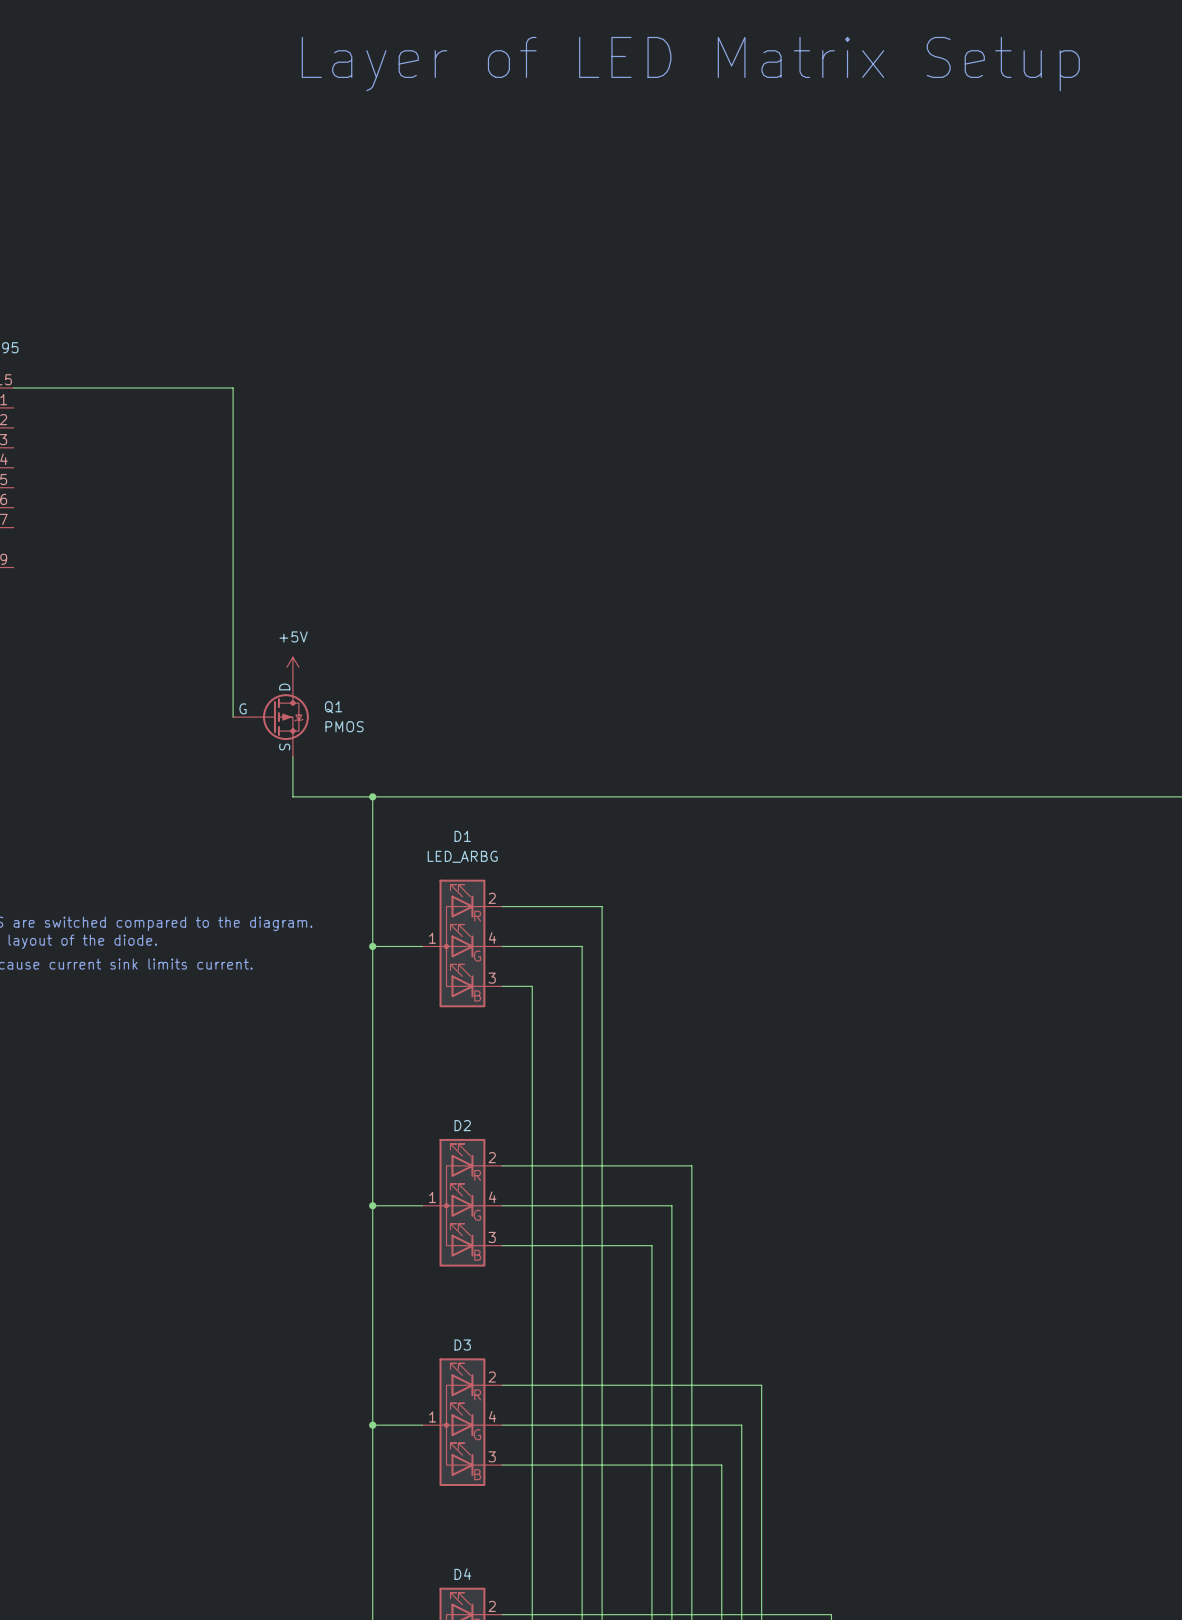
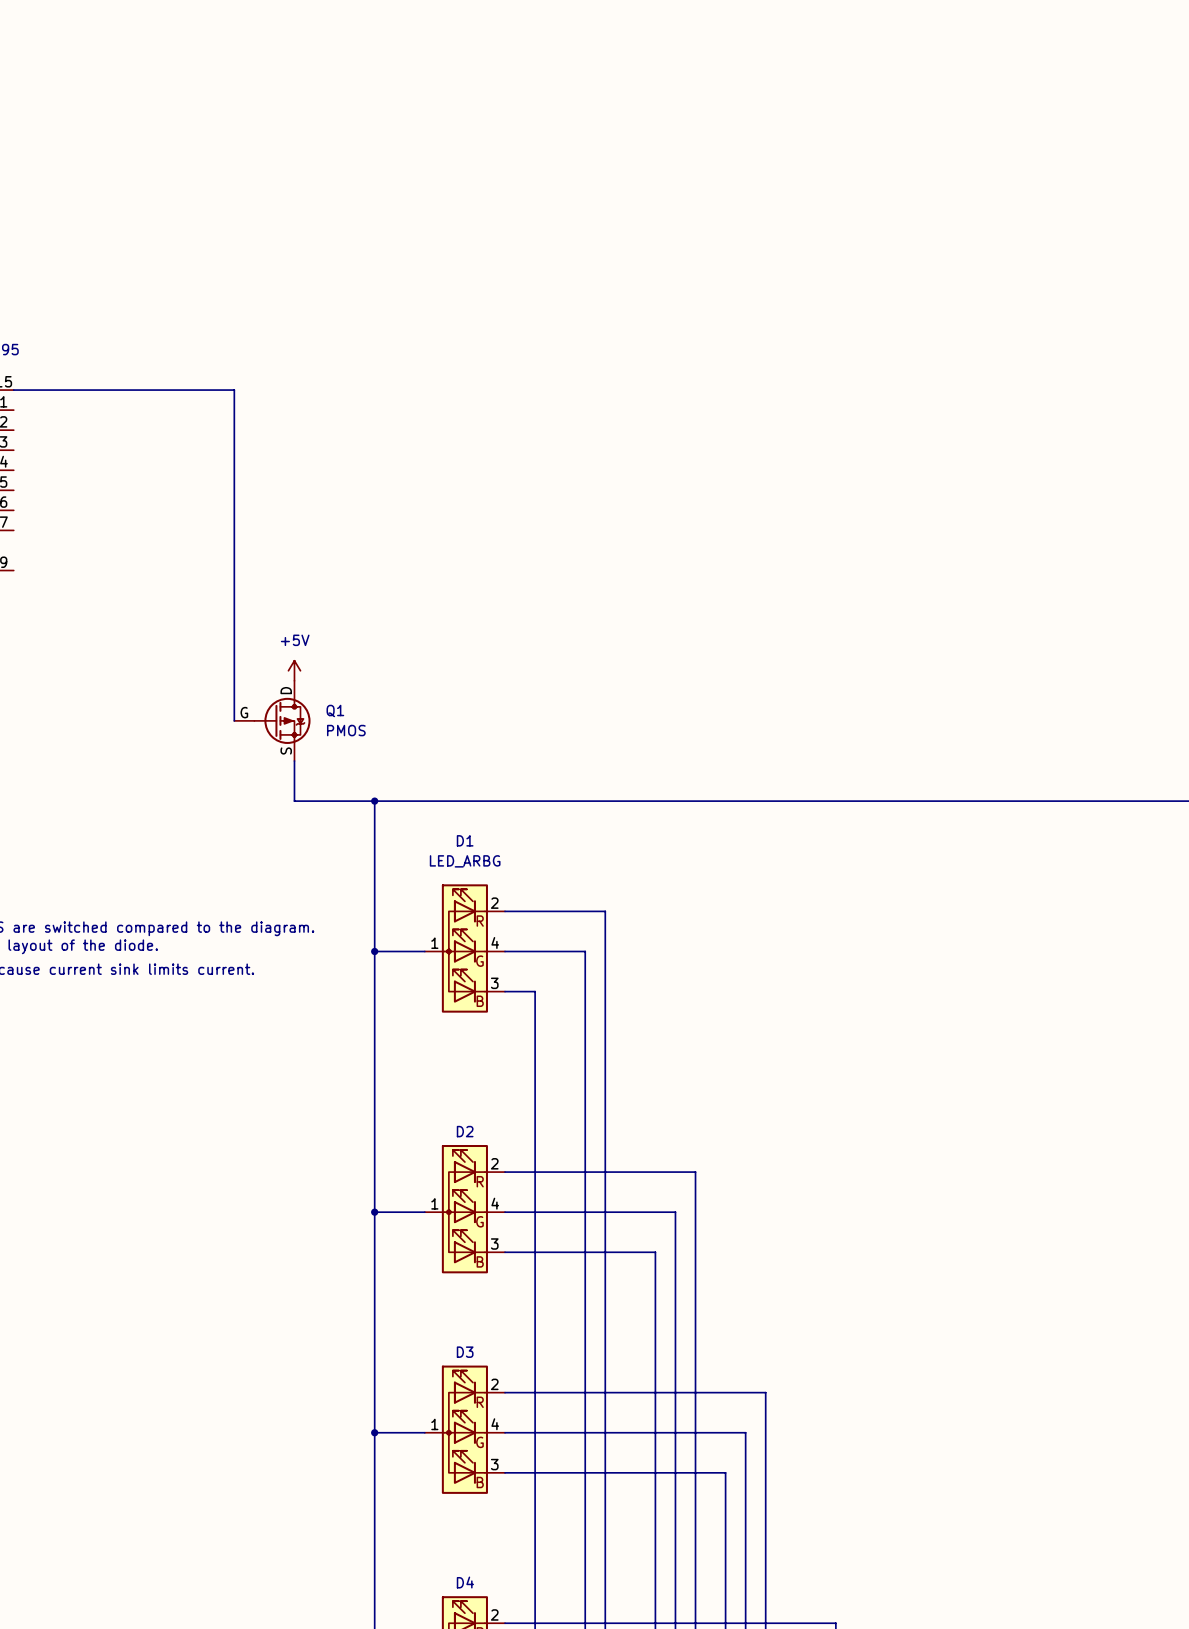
text: Layer of LED Matrix Setup (690, 64) -> none

